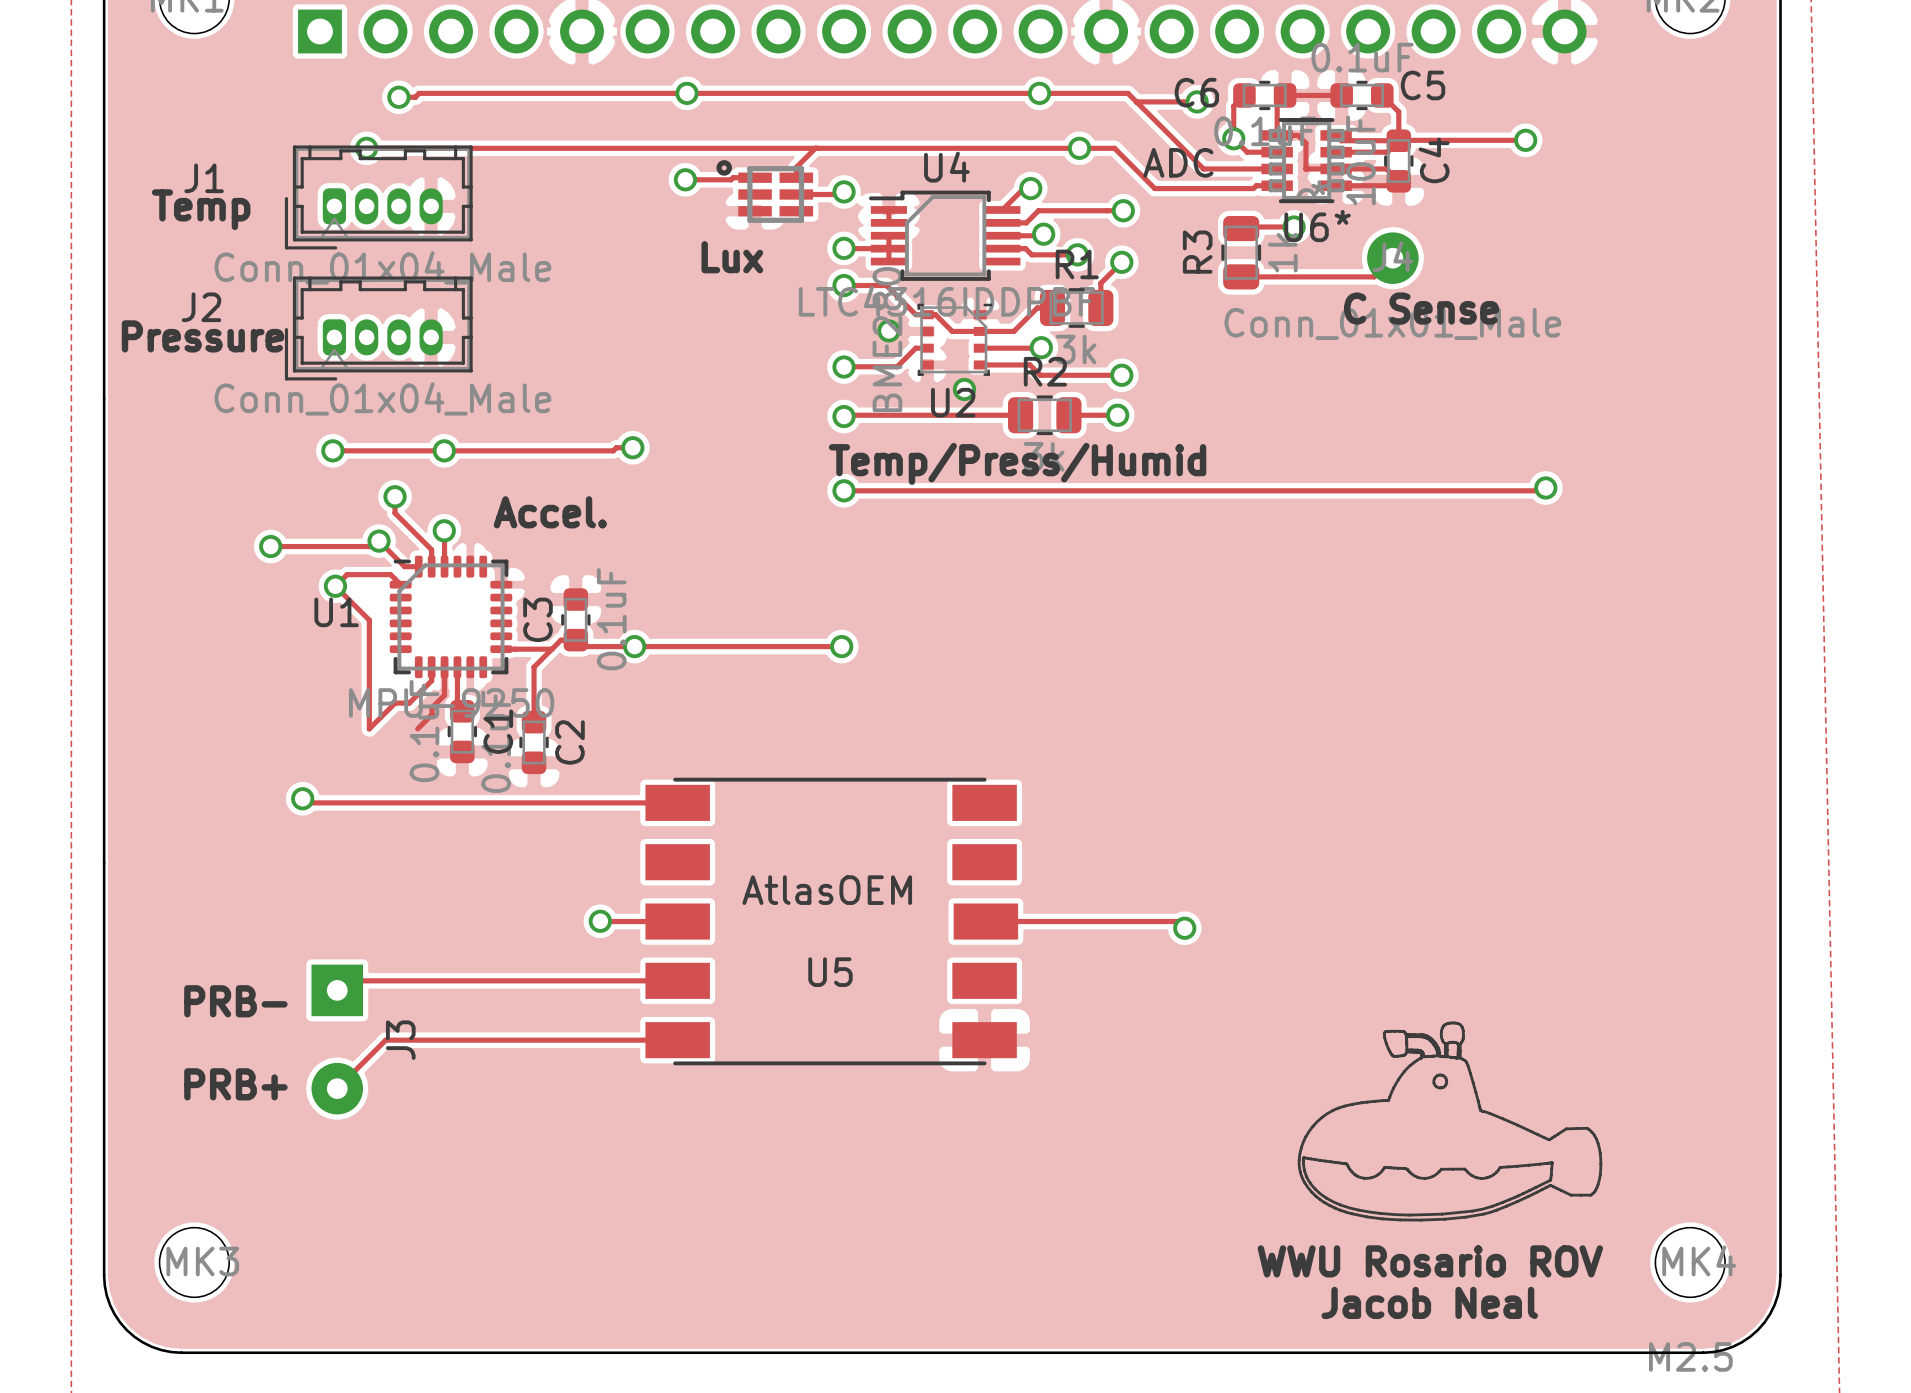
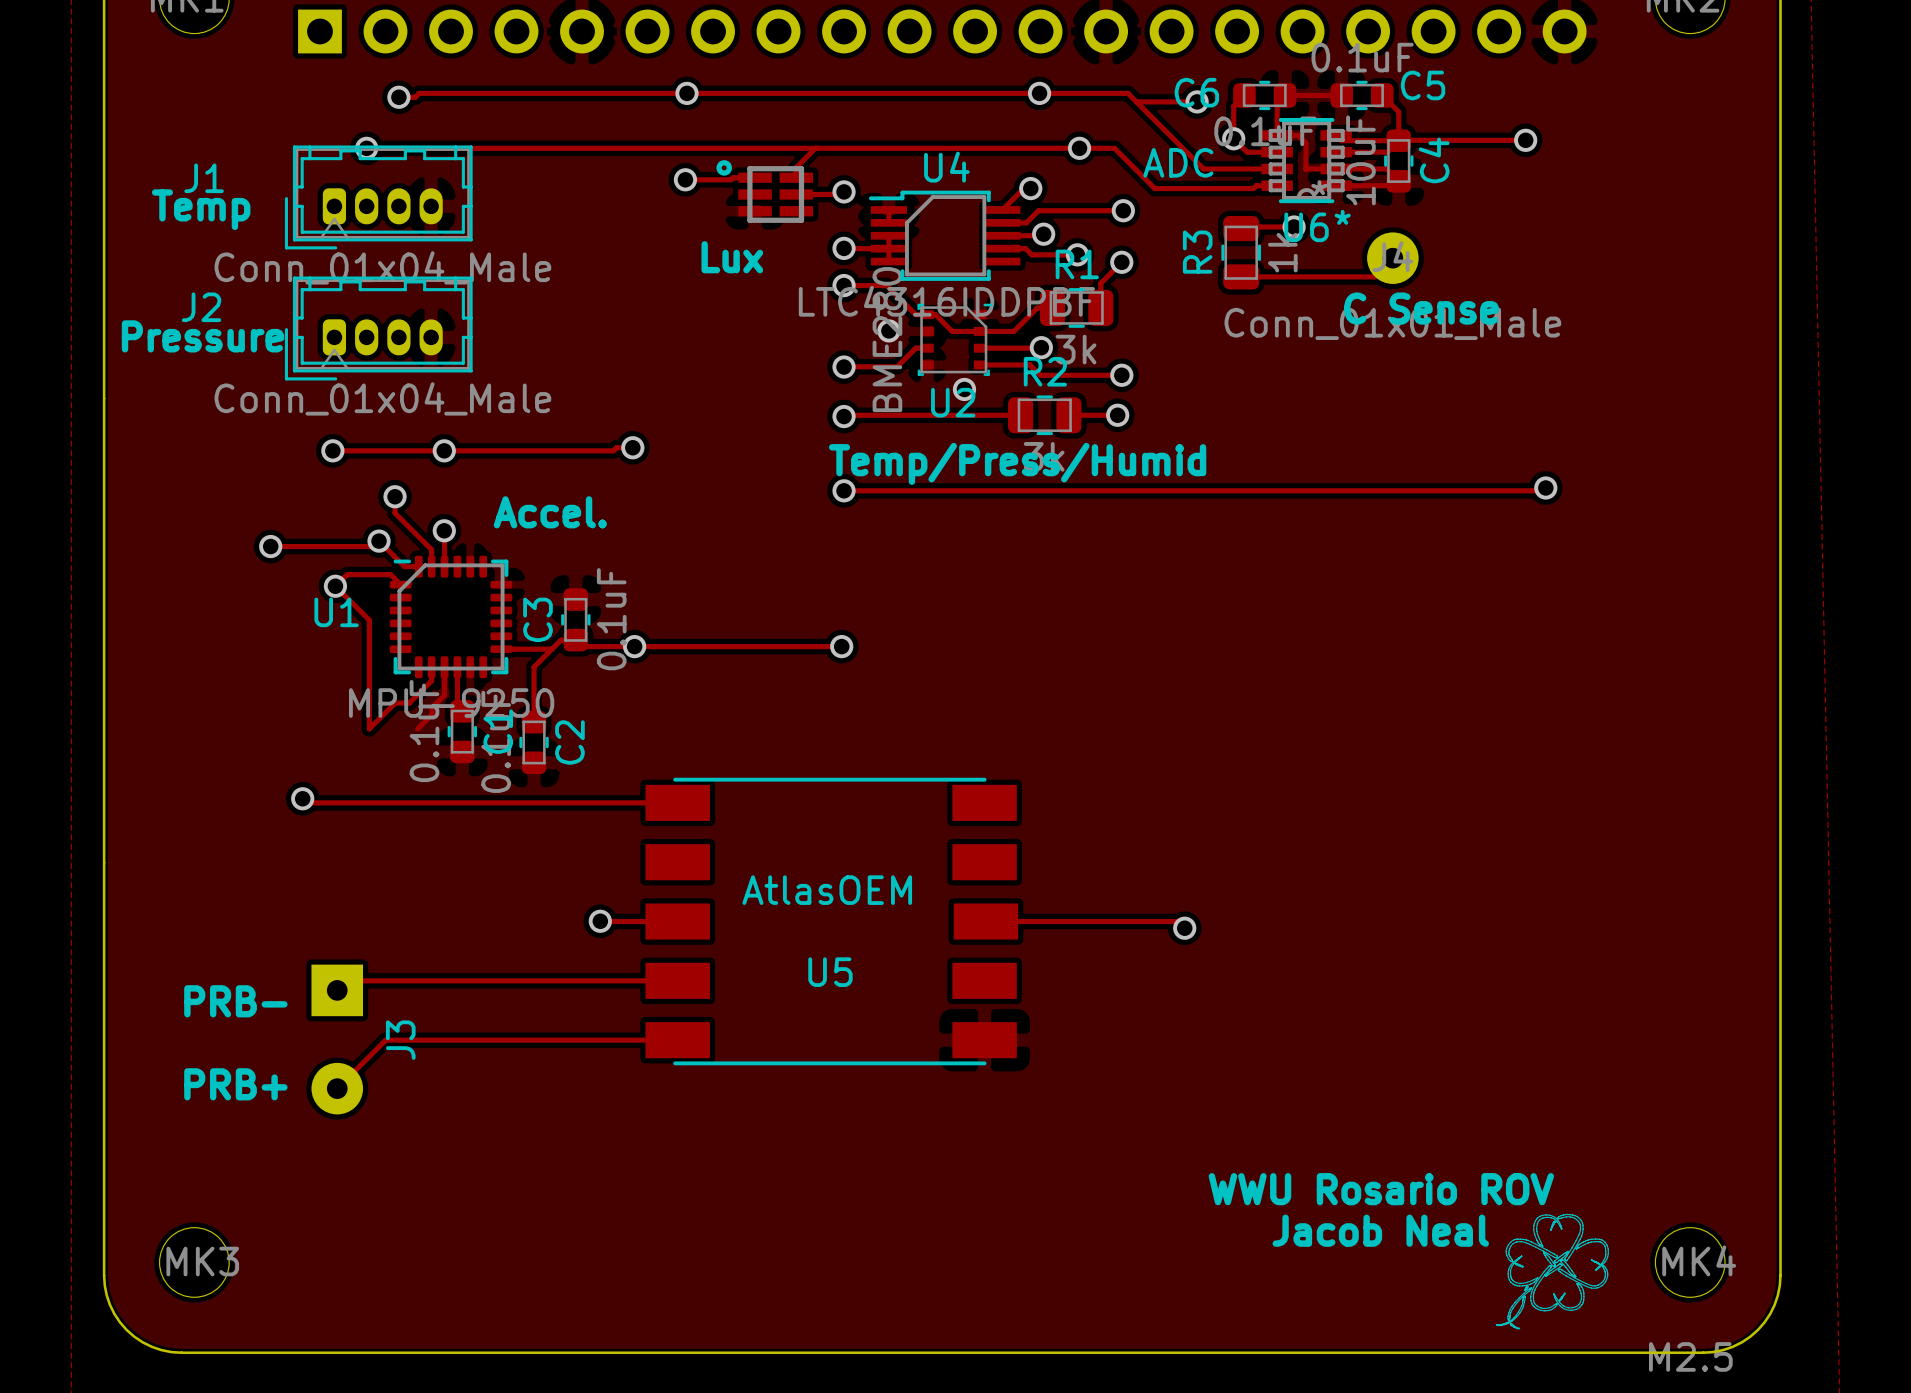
line: (1412, 1036) (1406, 1036) (1406, 1049) (1420, 1050) (1424, 1056) (1438, 1055) (1435, 1046) (1428, 1039) (1412, 1036) -> none
line: (1451, 1042) (1447, 1043) (1447, 1056) (1457, 1058) (1458, 1044) (1451, 1042) -> none
line: (1440, 1074) (1444, 1076) (1446, 1081) (1444, 1086) (1440, 1087) (1435, 1086) (1433, 1081) (1435, 1077) (1437, 1075) (1440, 1074) -> none
line: (1551, 1162) (1500, 1167) (1493, 1174) (1484, 1178) (1473, 1176) (1464, 1169) (1441, 1169) (1432, 1176) (1423, 1178) (1413, 1175) (1406, 1168) (1384, 1167) (1376, 1175) (1365, 1178) (1355, 1175) (1346, 1163) (1303, 1157) (1303, 1159) (1305, 1173) (1310, 1183) (1320, 1193) (1333, 1201) (1369, 1211) (1409, 1215) (1472, 1211) (1492, 1206) (1550, 1180) (1552, 1162) -> none
line: (1550, 1185) (1506, 1206) (1483, 1214) (1444, 1219) (1382, 1218) (1345, 1211) (1318, 1197) (1307, 1187) (1302, 1177) (1299, 1166) (1299, 1154) (1305, 1136) (1322, 1117) (1345, 1106) (1388, 1100) (1401, 1075) (1410, 1065) (1421, 1057) (1420, 1053) (1418, 1052) (1406, 1052) (1403, 1055) (1393, 1055) (1386, 1043) (1385, 1032) (1402, 1031) (1406, 1034) (1426, 1035) (1435, 1043) (1439, 1056) (1445, 1056) (1445, 1043) (1441, 1036) (1442, 1028) (1446, 1023) (1456, 1023) (1460, 1025) (1463, 1030) (1462, 1039) (1460, 1044) (1460, 1058) (1467, 1064) (1480, 1110) (1548, 1139) (1566, 1128) (1587, 1128) (1595, 1137) (1599, 1148) (1600, 1164) (1599, 1179) (1594, 1192) (1590, 1195) (1571, 1195) (1550, 1185) -> none
line: none -> (1546, 1214) (1537, 1218) (1533, 1226) (1536, 1240) (1542, 1246) (1536, 1230) (1540, 1219) (1546, 1217) (1553, 1218) (1561, 1229) (1556, 1218) (1546, 1214)
line: none -> (1565, 1214) (1558, 1218) (1573, 1217) (1578, 1221) (1580, 1227) (1576, 1240) (1565, 1258) (1566, 1260) (1580, 1237) (1583, 1227) (1581, 1221) (1577, 1216) (1565, 1214)
line: none -> (1554, 1221) (1550, 1230) (1554, 1221)
line: none -> (1517, 1239) (1529, 1241) (1557, 1256) (1555, 1257) (1529, 1244) (1518, 1241) (1513, 1243) (1509, 1248) (1509, 1254) (1512, 1260) (1511, 1261) (1506, 1255) (1506, 1248) (1511, 1241) (1517, 1239)
line: none -> (1576, 1248) (1580, 1243) (1589, 1239) (1600, 1239) (1604, 1242) (1607, 1248) (1607, 1256) (1603, 1263) (1595, 1269)
line: none -> (1576, 1248) (1591, 1242) (1599, 1241) (1604, 1244) (1605, 1256) (1595, 1269)
line: none -> (1567, 1251) (1555, 1262) (1564, 1256) (1567, 1251)
line: none -> (1543, 1252) (1543, 1253) (1544, 1255) (1546, 1258) (1550, 1263) (1554, 1265) (1543, 1252)
line: none -> (1521, 1256) (1512, 1263) (1508, 1271) (1509, 1281) (1518, 1285) (1530, 1284) (1537, 1277) (1521, 1283) (1511, 1279) (1511, 1268) (1513, 1264) (1521, 1256) (1521, 1256) (1521, 1256) (1521, 1256)
line: none -> (1562, 1259) (1575, 1276) (1570, 1272) (1561, 1260)
line: none -> (1591, 1260) (1599, 1263) (1591, 1260)
text position: WWU Rosario ROV (1430, 1261) -> WWU Rosario ROV (1381, 1189)
line: none -> (1515, 1263) (1517, 1263) (1523, 1266) (1515, 1263)
line: none -> (1560, 1263) (1561, 1265) (1545, 1276) (1560, 1263)
line: none -> (1549, 1265) (1551, 1267) (1534, 1290) (1533, 1300) (1537, 1306) (1543, 1308) (1556, 1304) (1550, 1309) (1541, 1310) (1532, 1304) (1531, 1294) (1535, 1283) (1549, 1265)
line: none -> (1603, 1266) (1604, 1266) (1605, 1267) (1607, 1271) (1606, 1278) (1603, 1284) (1595, 1288) (1586, 1286) (1558, 1270) (1560, 1269) (1585, 1283) (1594, 1285) (1604, 1278) (1603, 1266)
line: none -> (1577, 1283) (1583, 1290) (1582, 1303) (1574, 1309) (1563, 1308) (1558, 1303) (1553, 1293) (1563, 1306) (1575, 1306) (1579, 1303) (1581, 1297) (1576, 1283)
line: none -> (1527, 1286) (1524, 1290) (1527, 1286)
line: none -> (1531, 1287) (1512, 1306) (1508, 1314) (1508, 1320) (1512, 1308) (1531, 1287)
line: none -> (1564, 1293) (1559, 1300) (1564, 1293)
line: none -> (1524, 1296) (1520, 1309) (1513, 1318) (1505, 1323) (1496, 1324)
line: none -> (1525, 1296) (1522, 1308) (1516, 1317) (1507, 1323) (1496, 1324)
text position: Jacob Neal (1429, 1302) -> Jacob Neal (1380, 1230)
line: none -> (1519, 1328) (1510, 1323) (1519, 1328)

